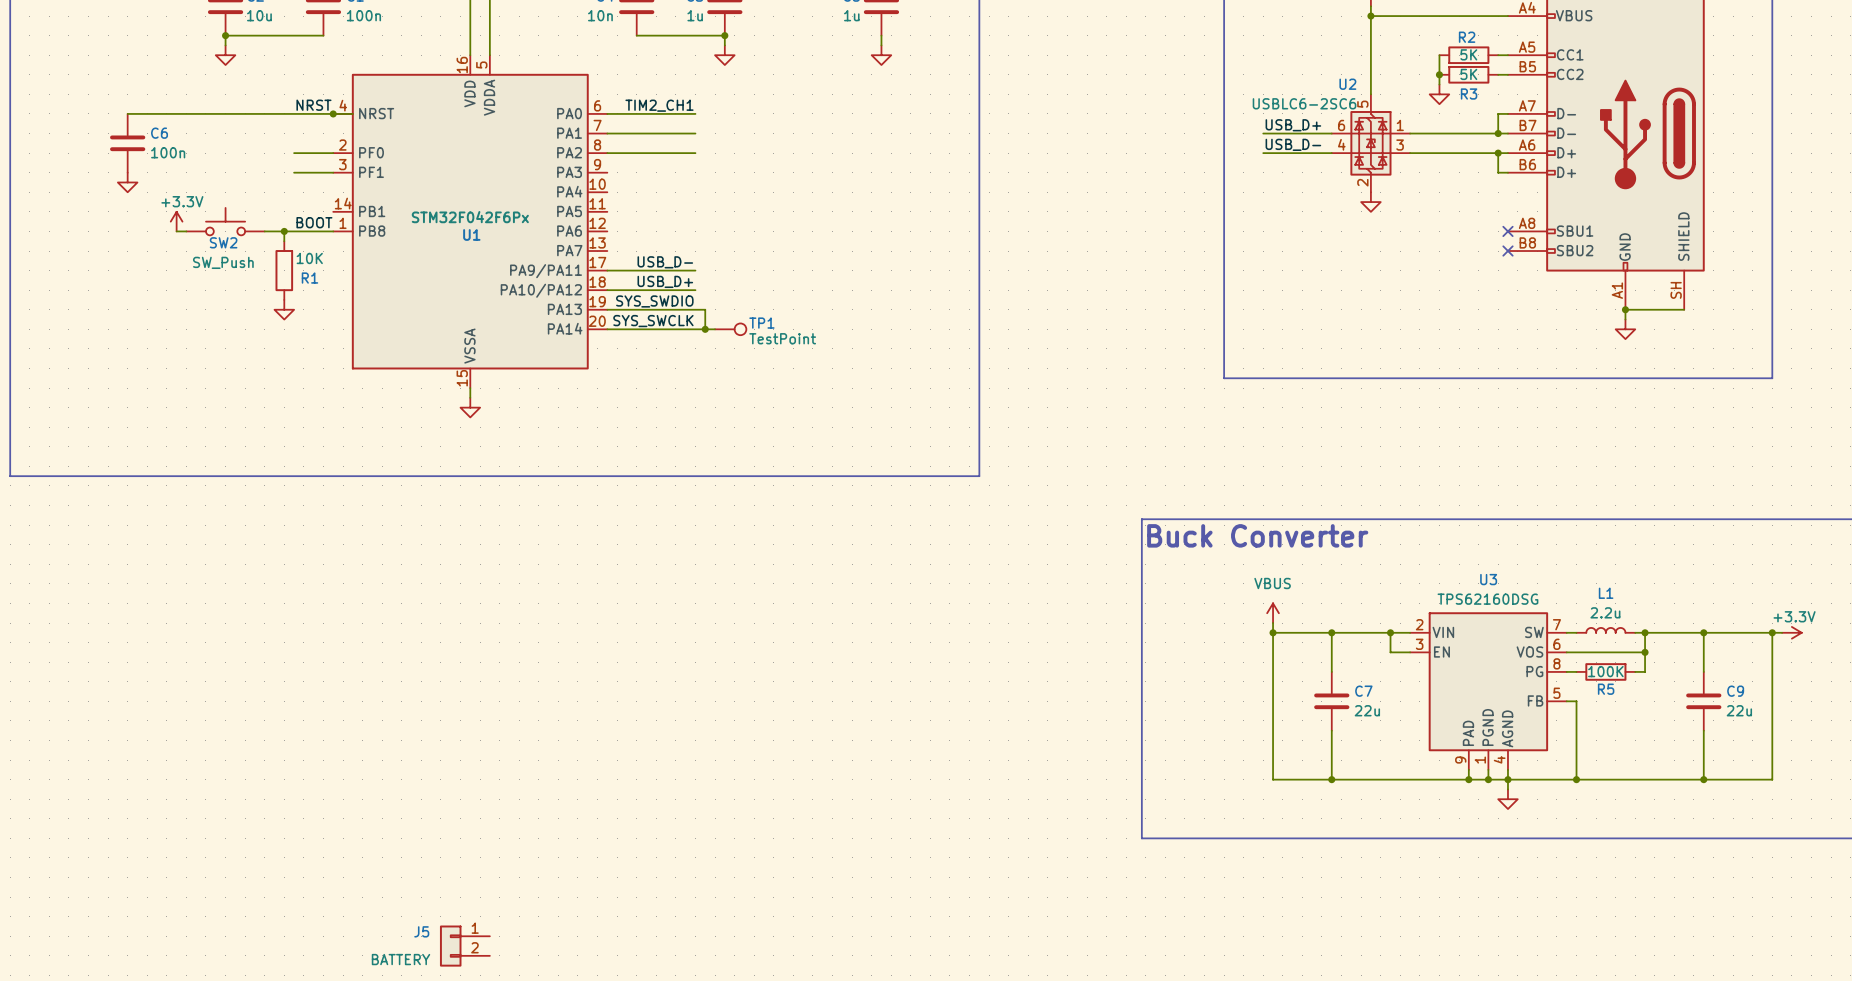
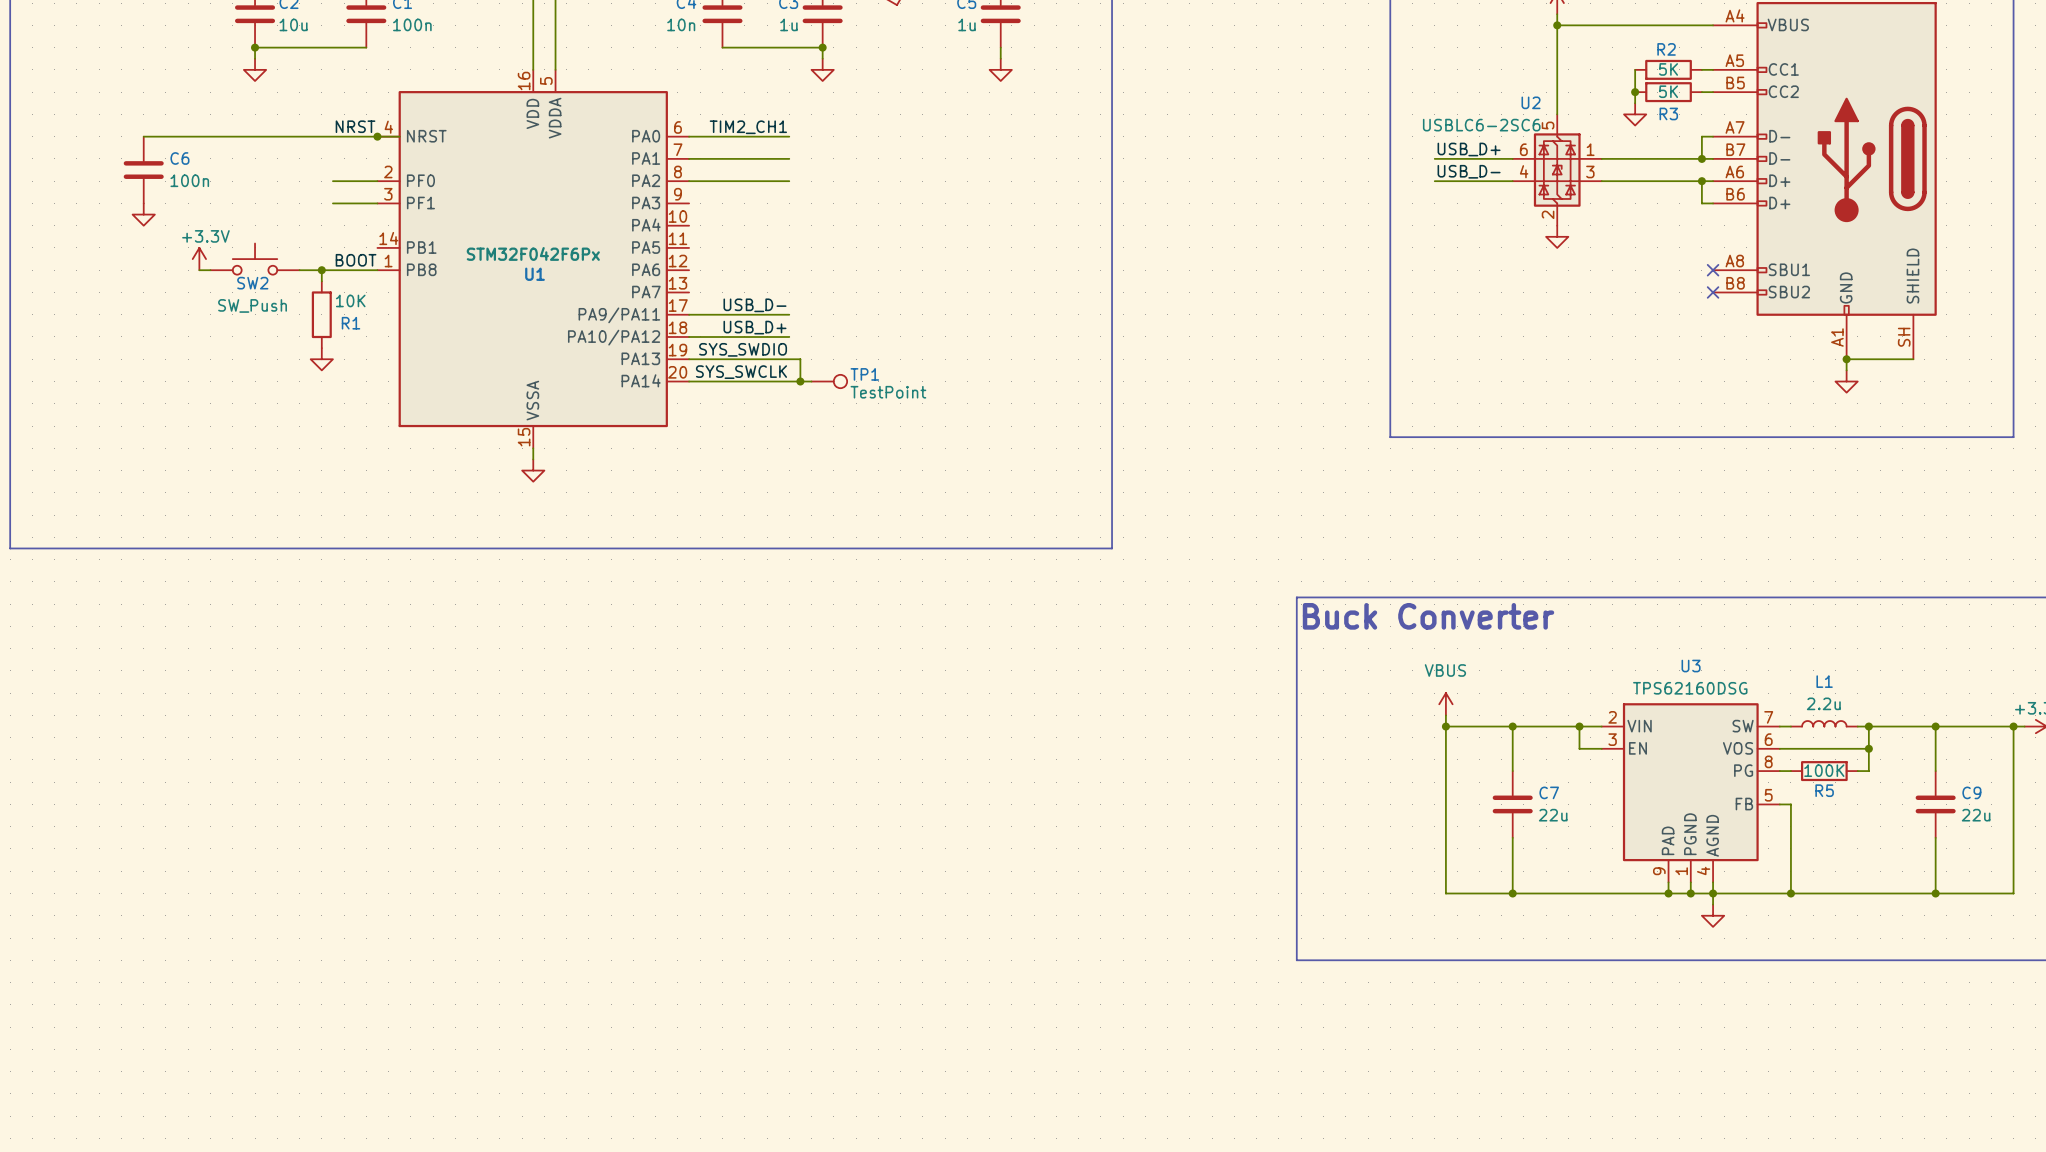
J5: BATTERY (464, 946) -> none

